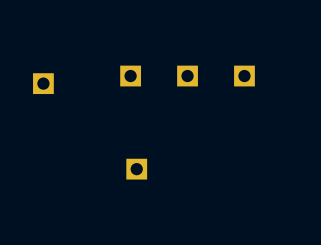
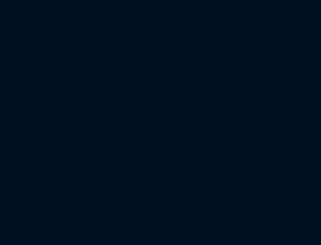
part: (130, 76) -> none
part: (187, 76) -> none
part: (244, 76) -> none
part: (43, 83) -> none
part: (136, 169) -> none

